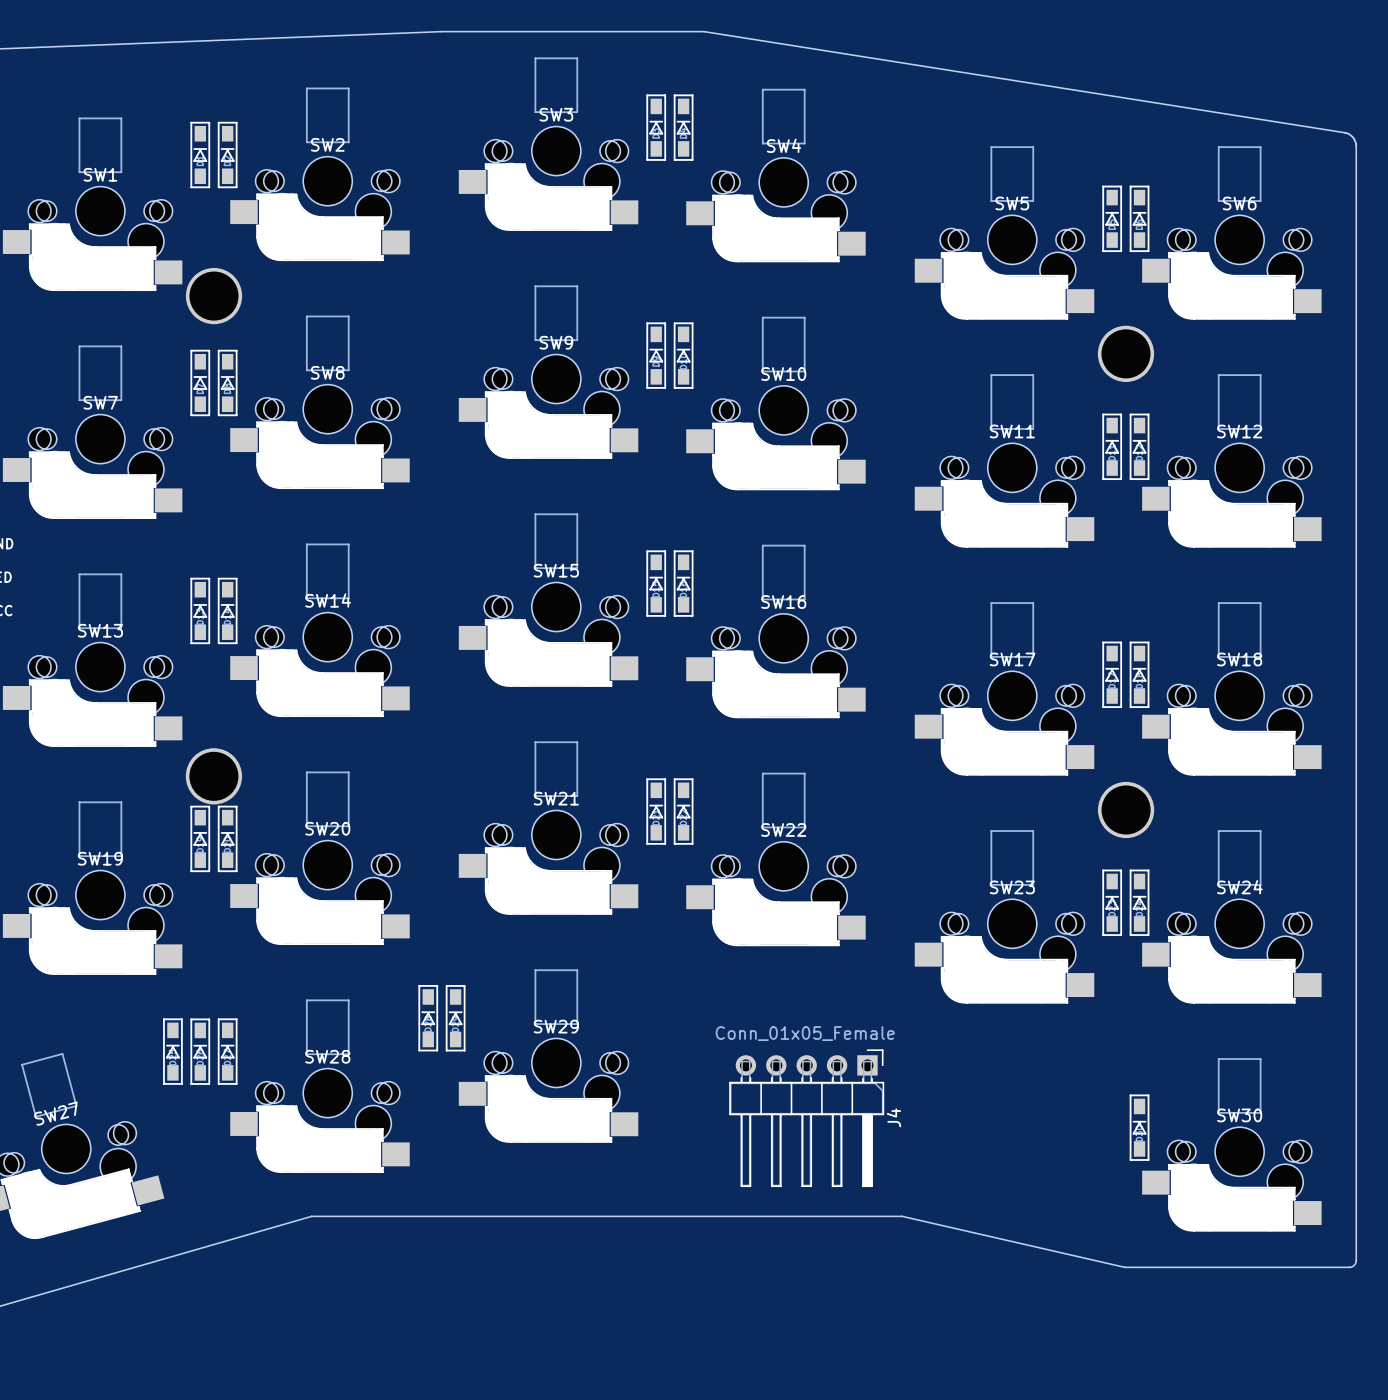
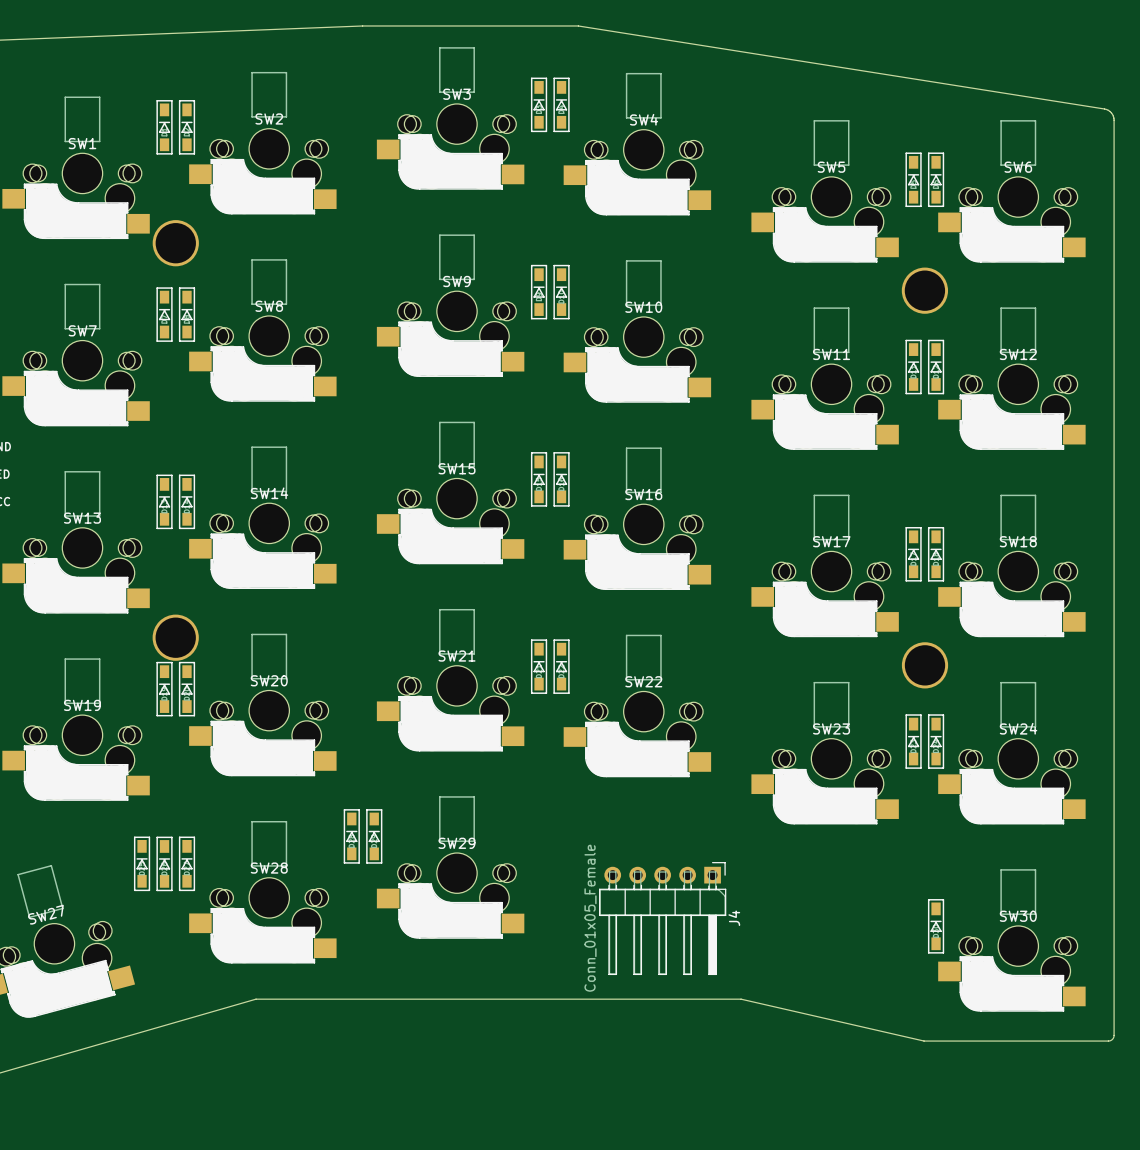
J4 value rotation: 0° (805, 1033) -> 90° counterclockwise (590, 918)

